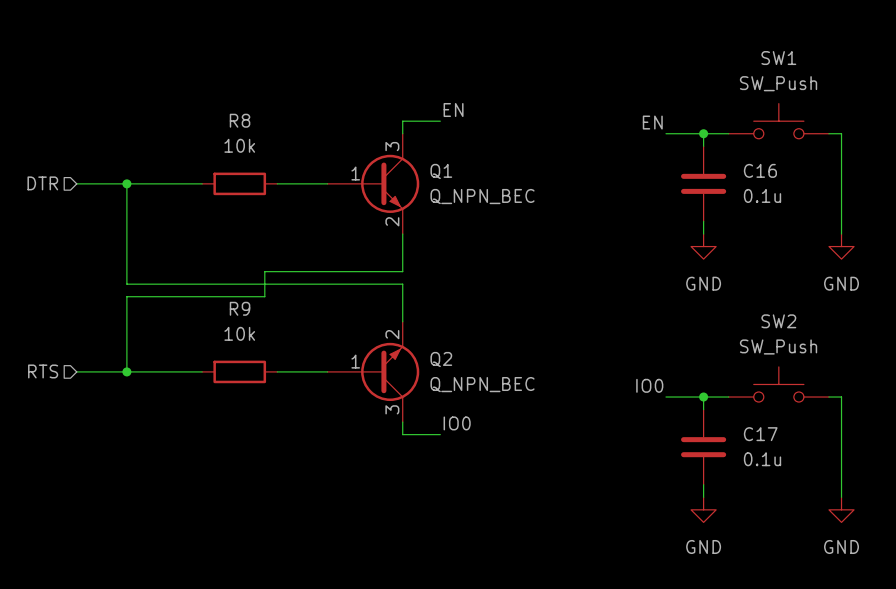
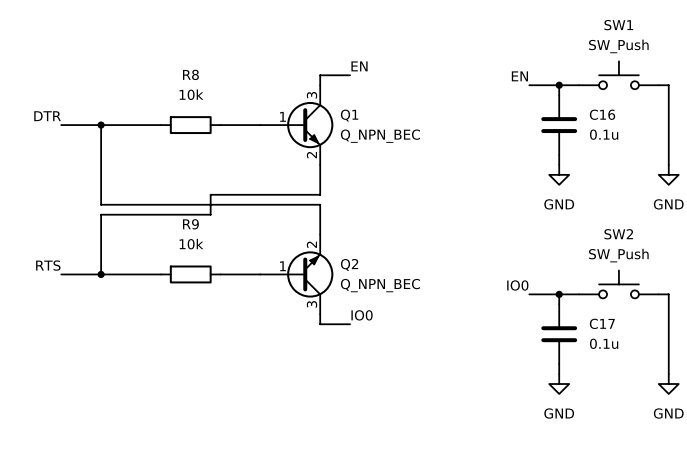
label: none -> DTR (47, 116)
hierarchical label: DTR (42, 183) -> none
label: none -> RTS (48, 265)
hierarchical label: RTS (43, 371) -> none

